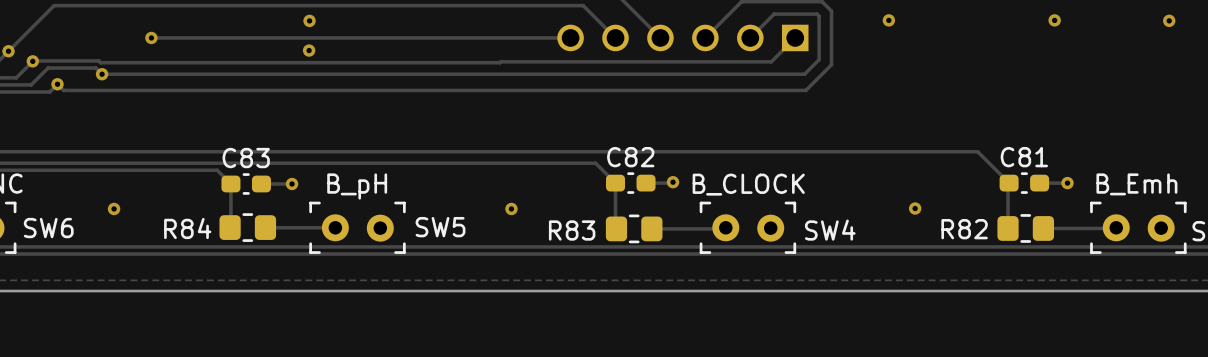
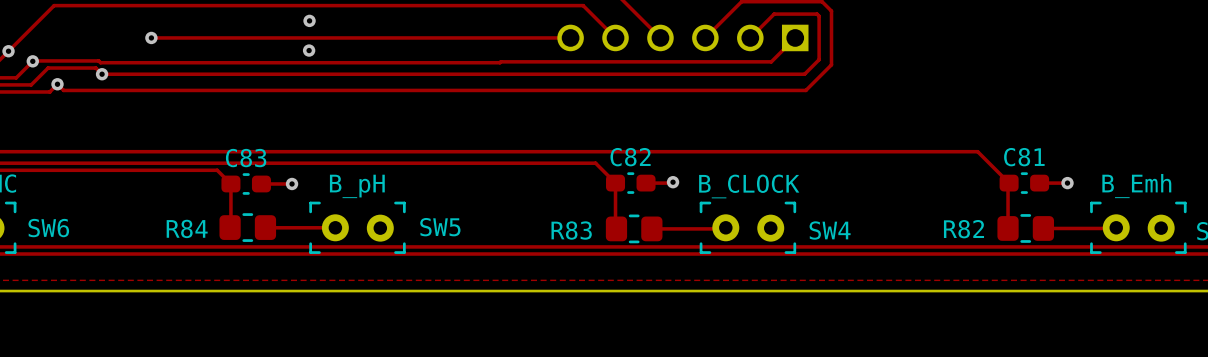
via: (888, 20) -> none
via: (1054, 20) -> none
via: (1169, 20) -> none
via: (114, 208) -> none
via: (511, 208) -> none
via: (915, 208) -> none

